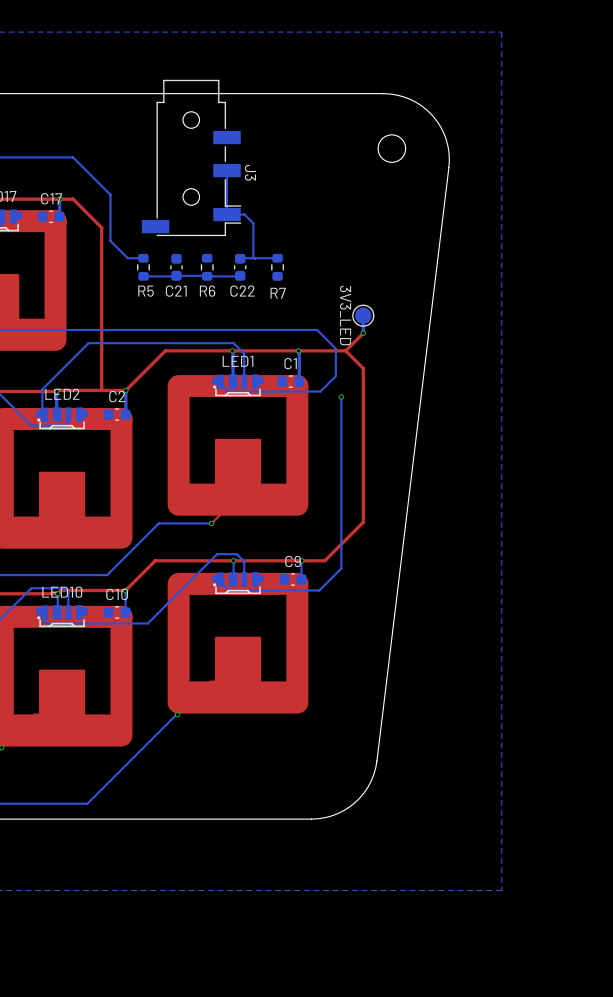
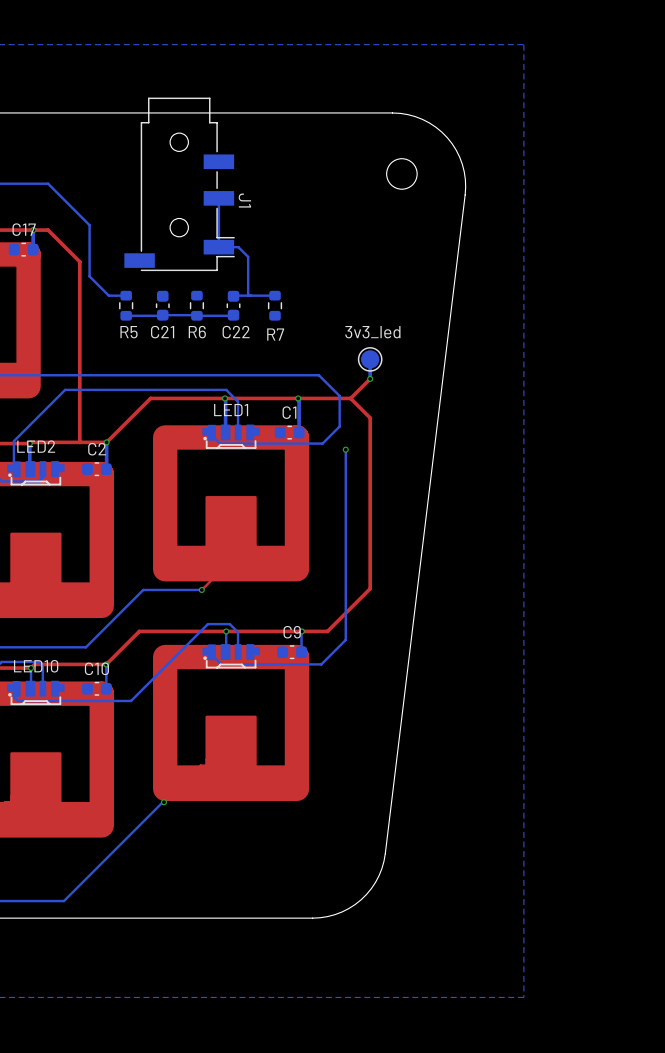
J3 name: J3 (250, 172) -> J1 (244, 200)
text: none -> 3v3_led (372, 332)
3V3_LED name: 3V3_LED (345, 315) -> none

